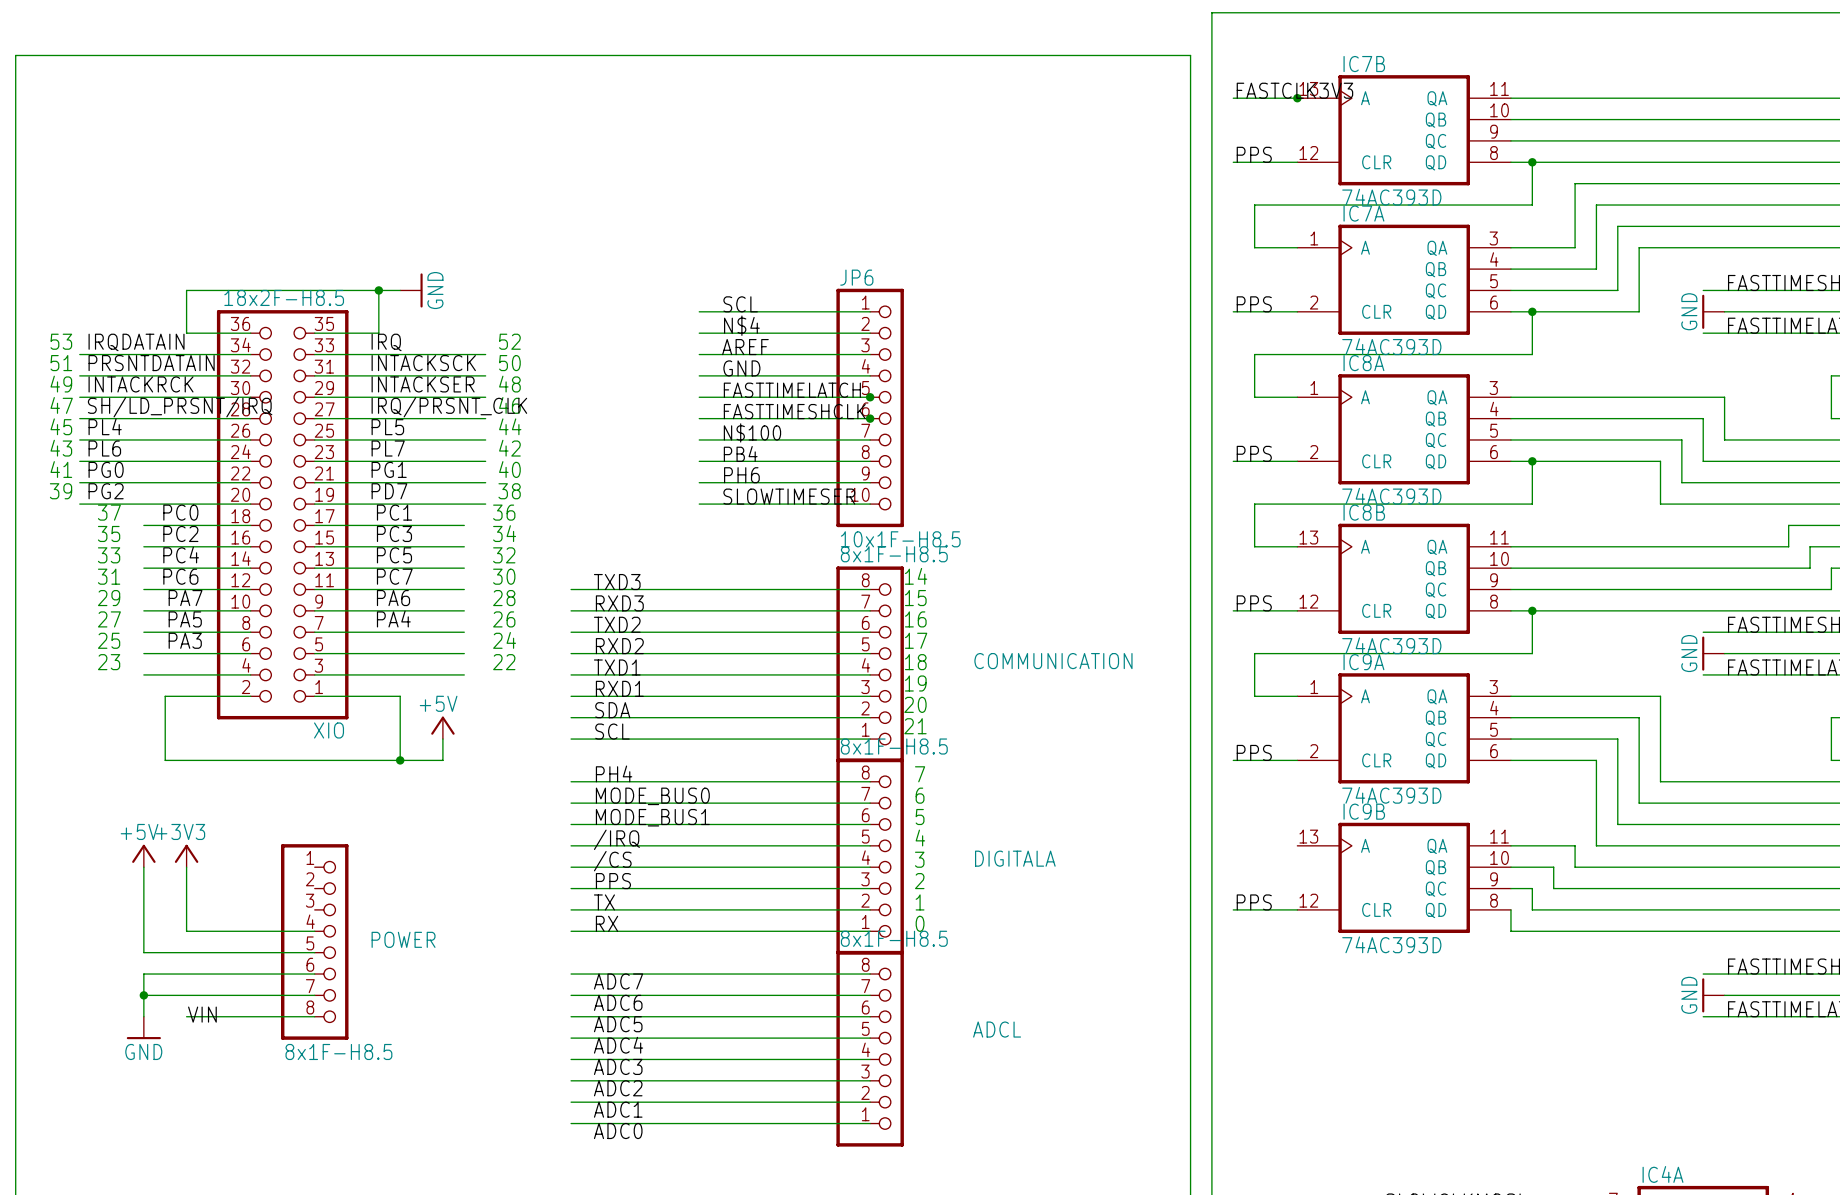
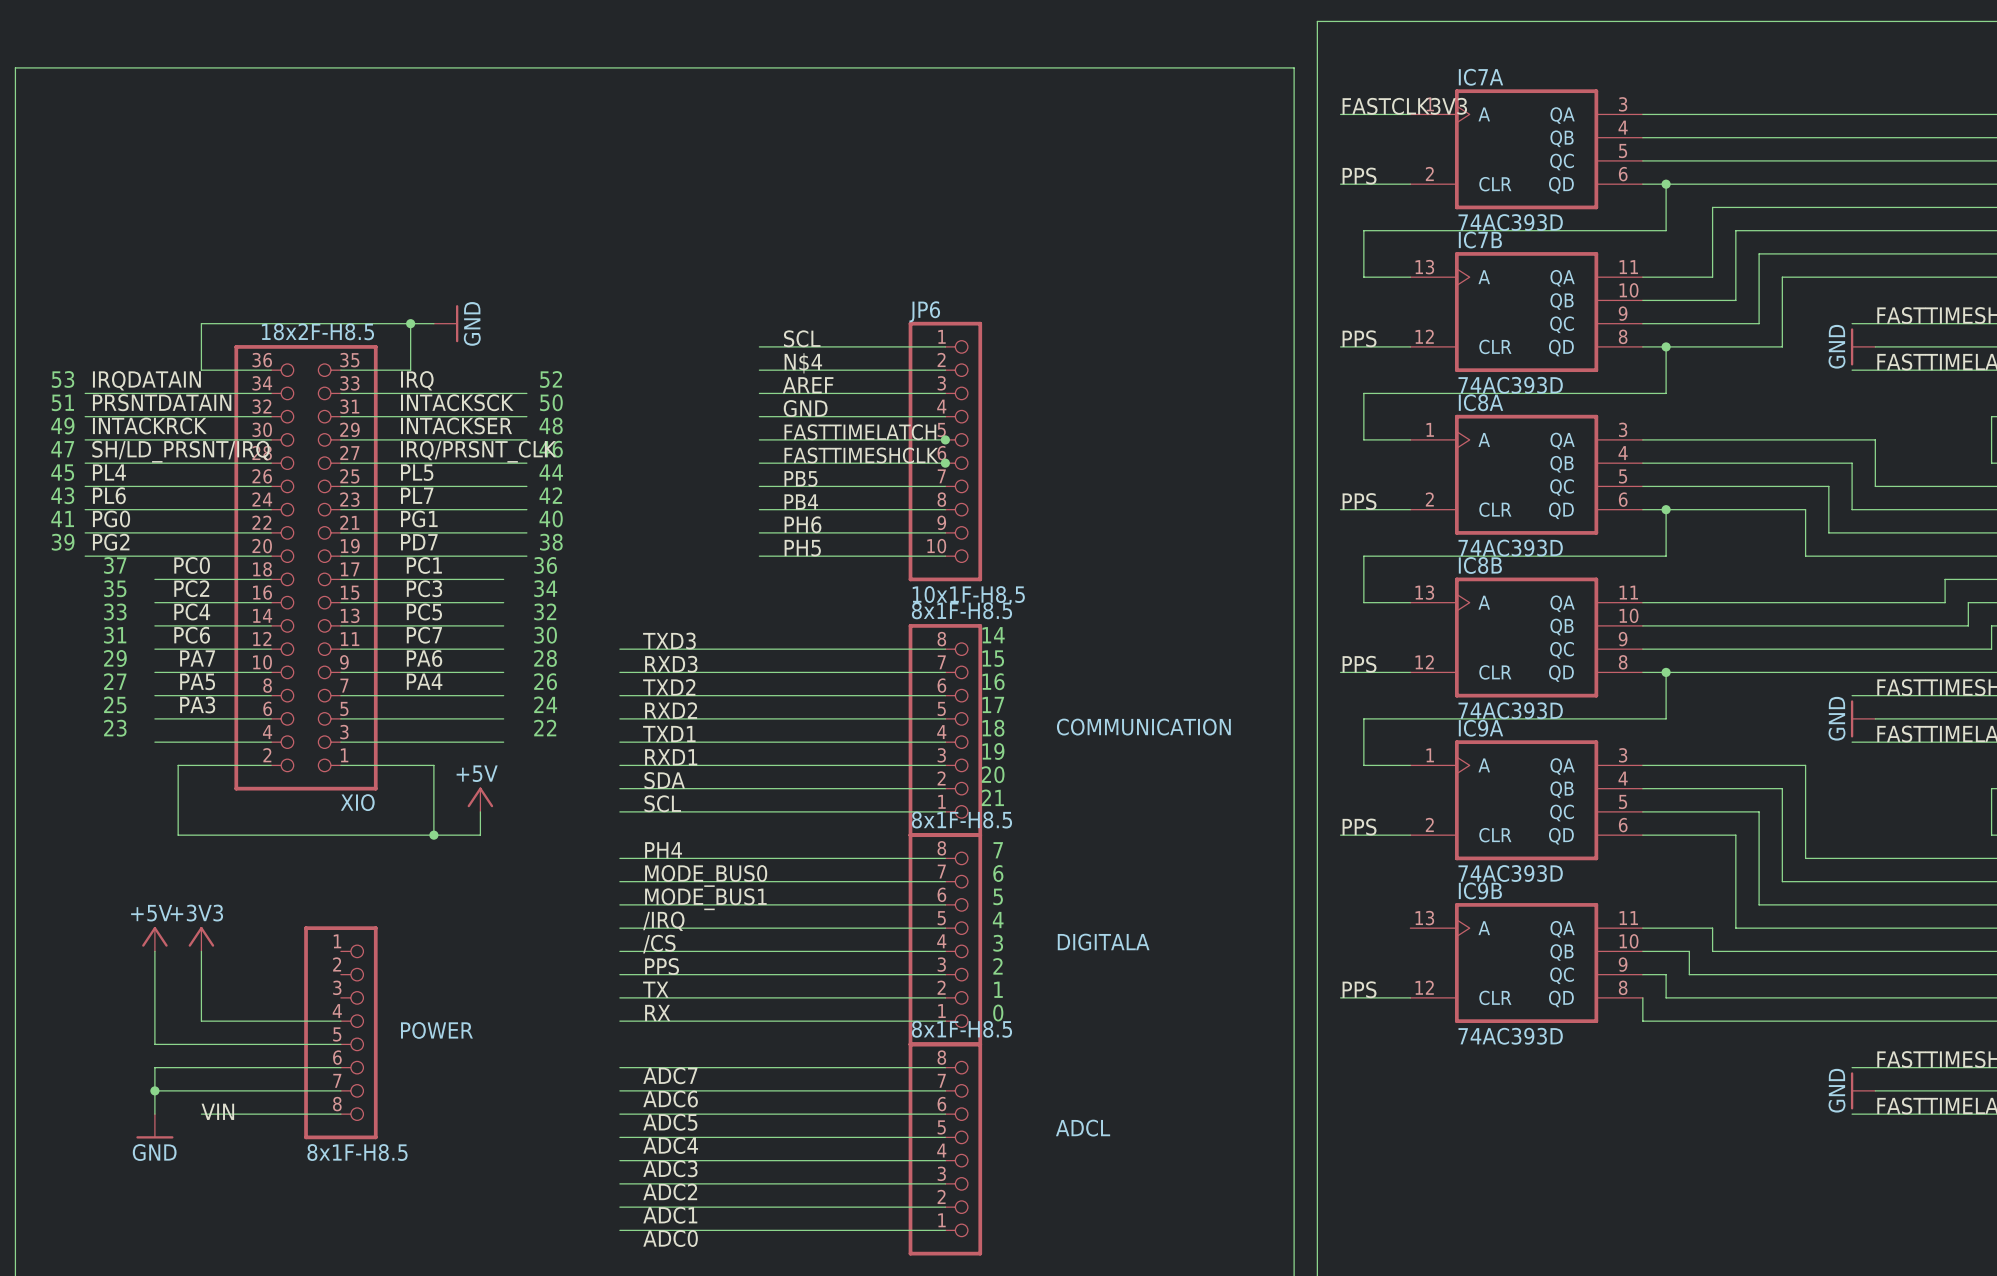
junction: (1297, 98) -> none
IC7B position: (1404, 130) -> (1526, 312)
IC7A position: (1404, 279) -> (1526, 149)
label: N$100 (752, 432) -> PB5 (800, 478)
label: SLOWTIMESER (789, 496) -> PH5 (802, 548)

